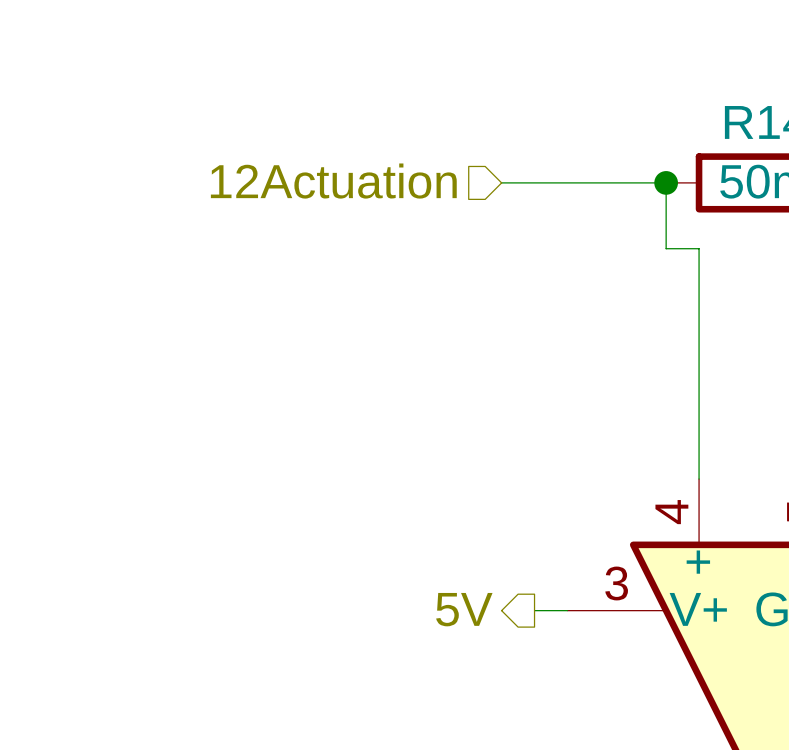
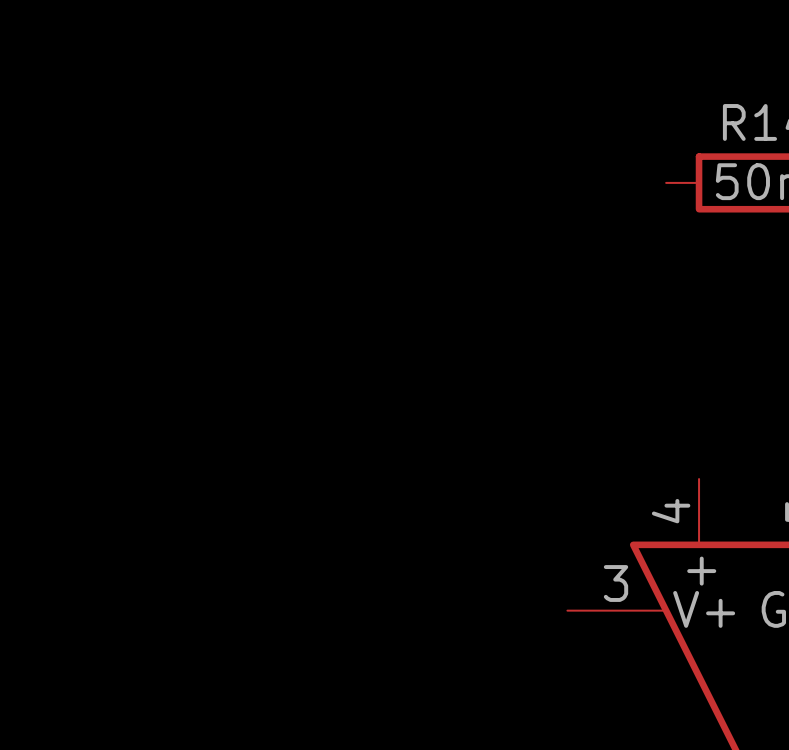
hierarchical label: 12Actuation (333, 181) -> none
wire: (501, 182) (666, 182) (666, 248) (699, 248) (699, 479) -> none
junction: (666, 182) -> none
hierarchical label: 5V (464, 609) -> none
wire: (534, 610) (567, 610) -> none

